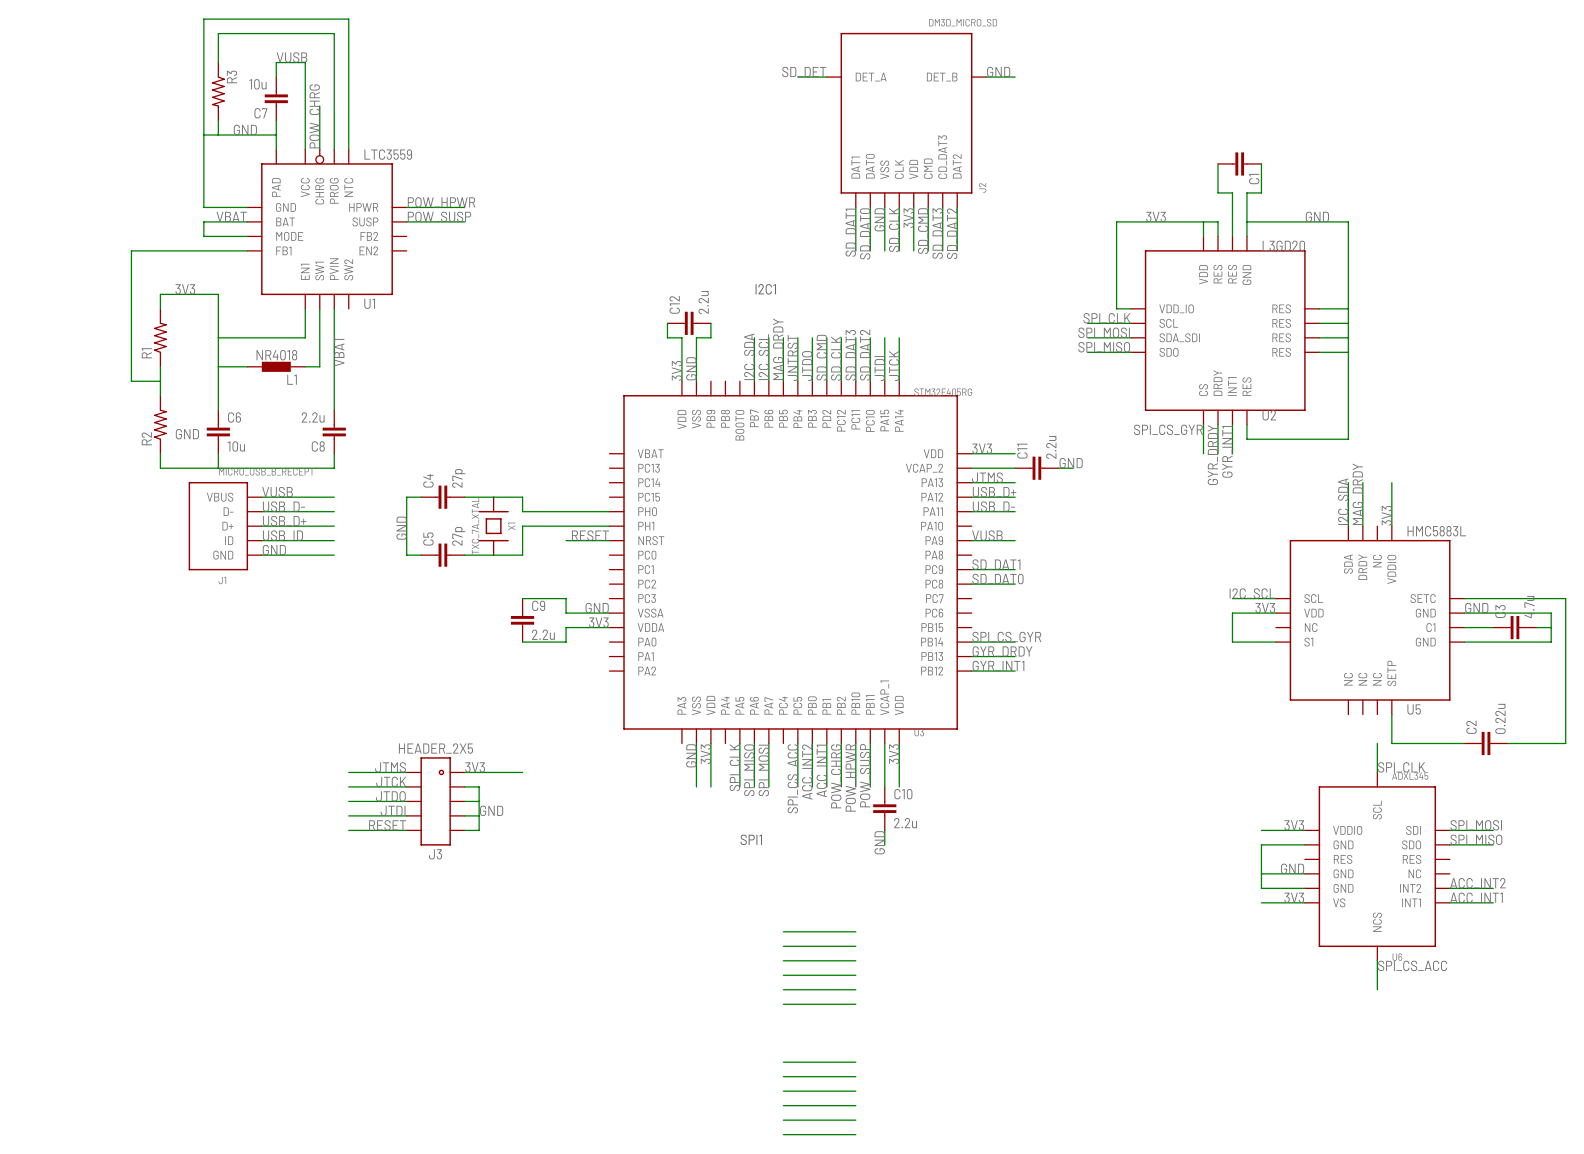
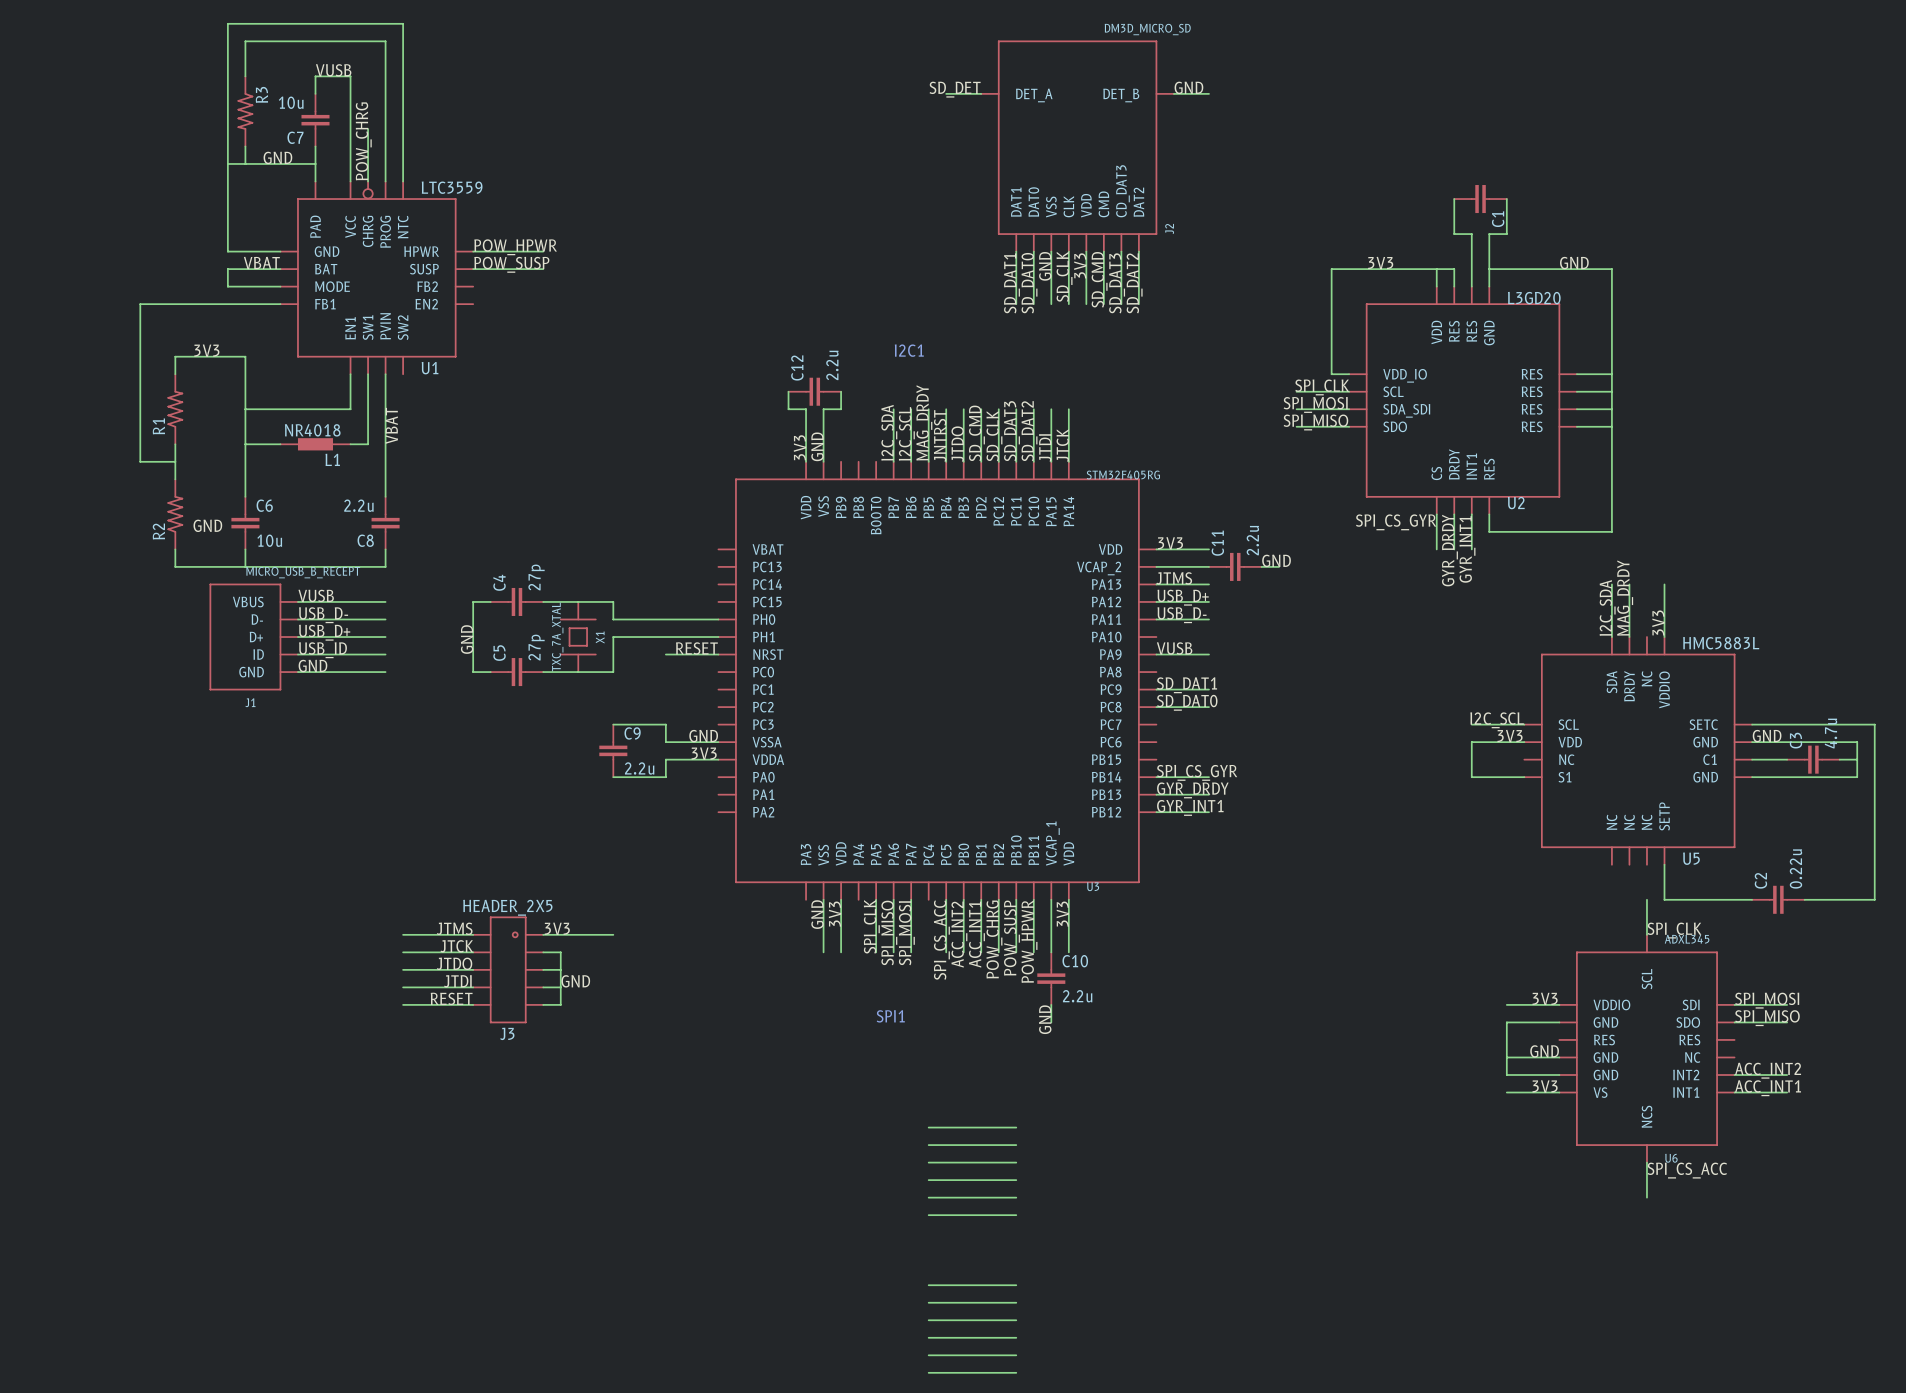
label: POW_SUSP (865, 775) -> POW_HPWR (1029, 941)
label: POW_HPWR (850, 777) -> POW_SUSP (1011, 938)

